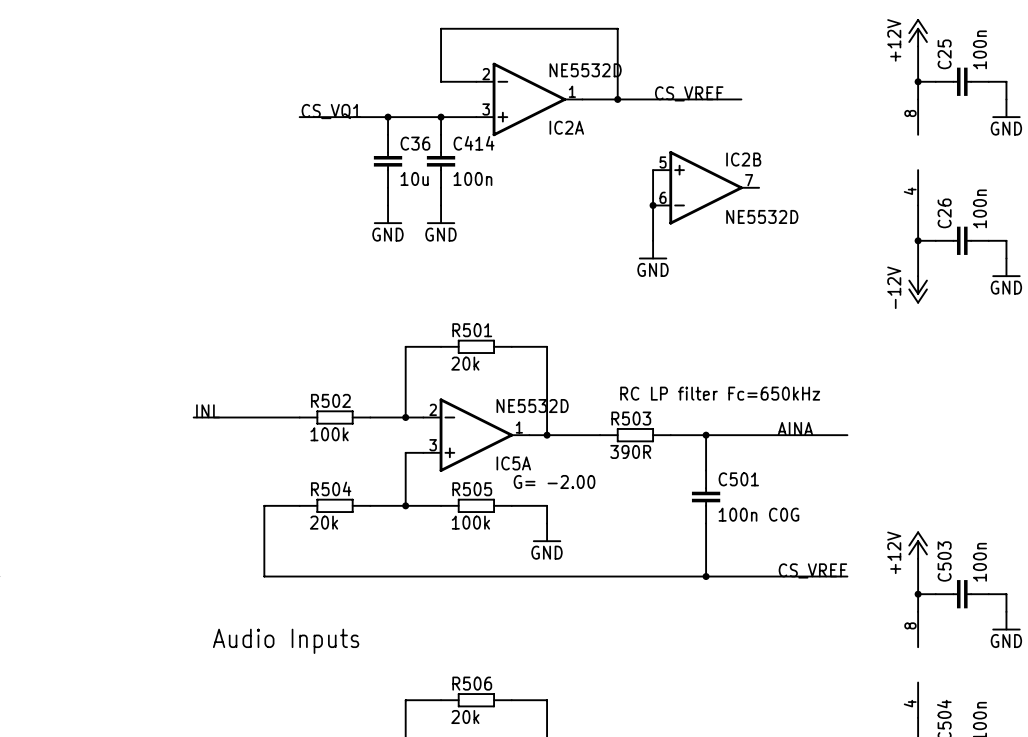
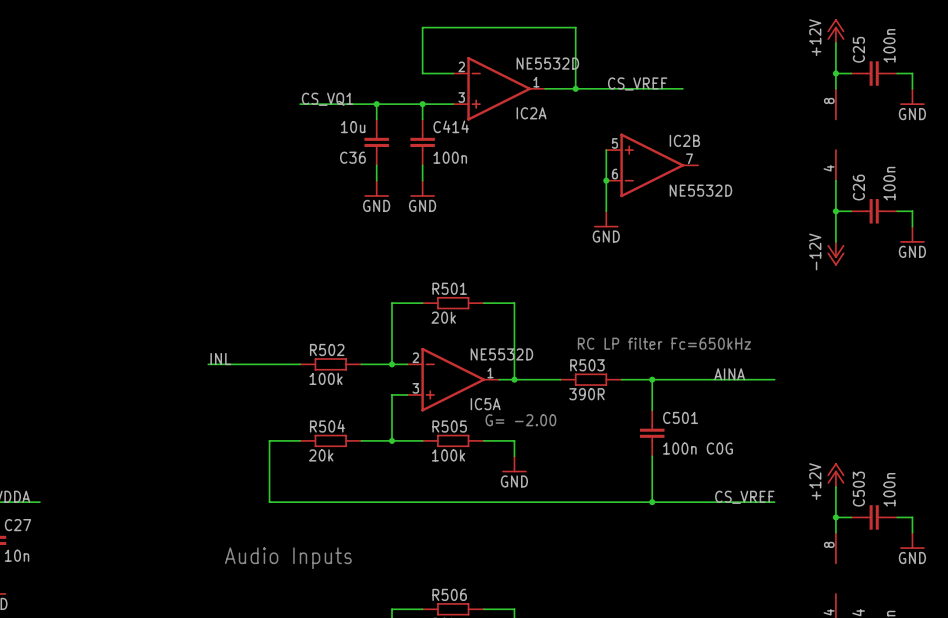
C36 name position: C36 (415, 143) -> C36 (352, 157)
C36 value position: 10u (414, 178) -> 10u (353, 127)

